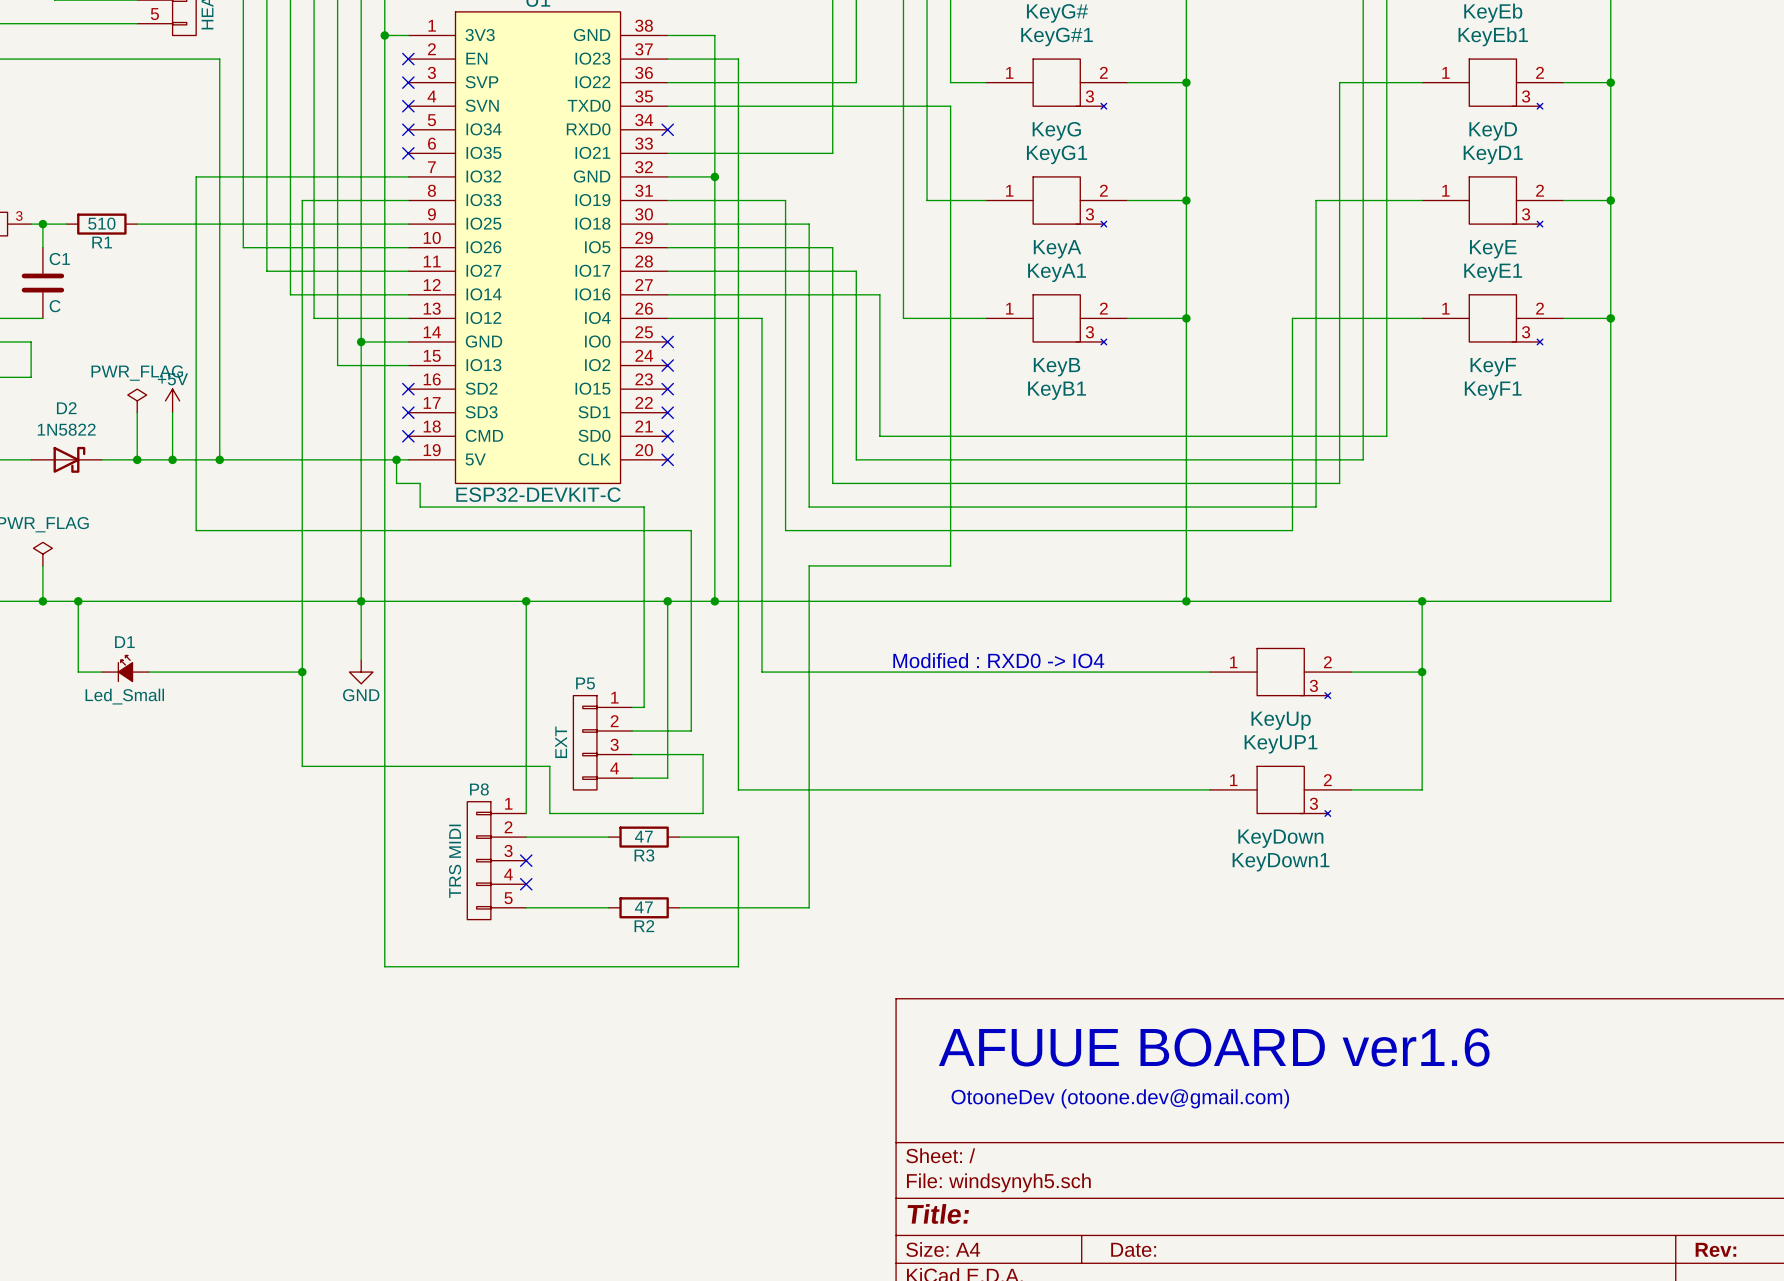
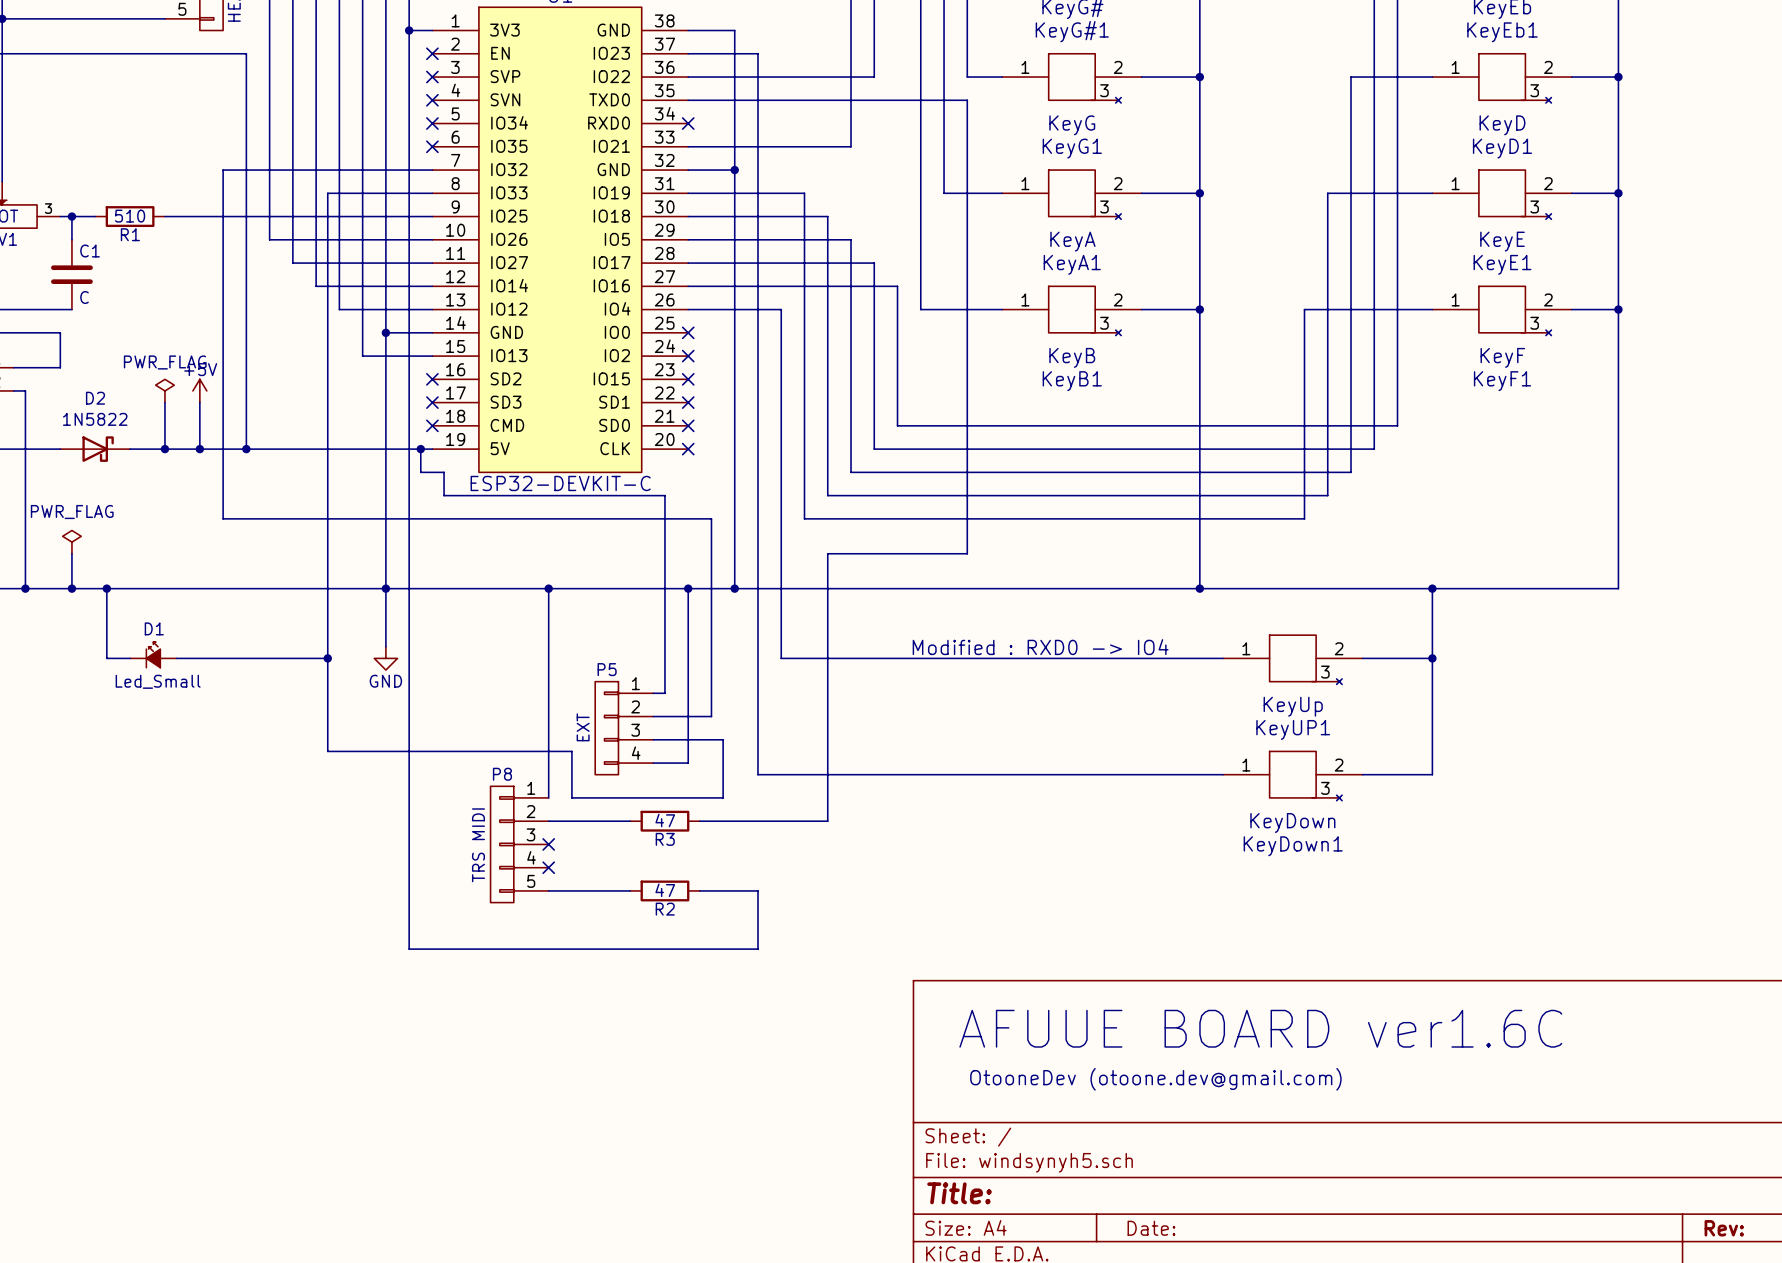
wire: (738, 837) (738, 907) (809, 907) (809, 837) -> (757, 821) (827, 821)
text: AFUUE BOARD ver1.6 (1214, 1047) -> AFUUE BOARD ver1.6C (1260, 1028)

